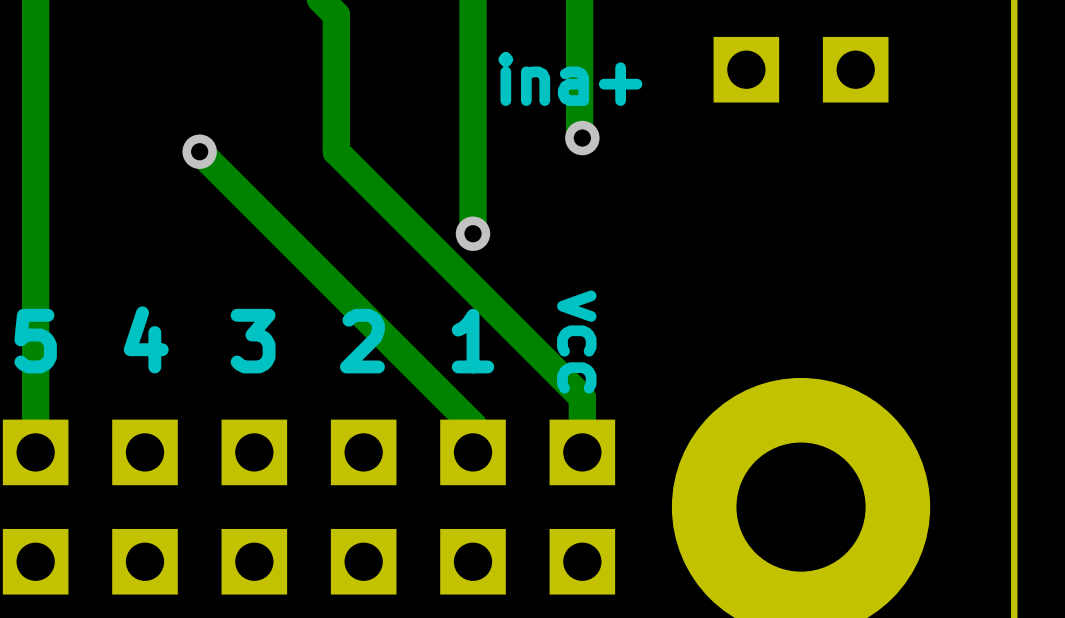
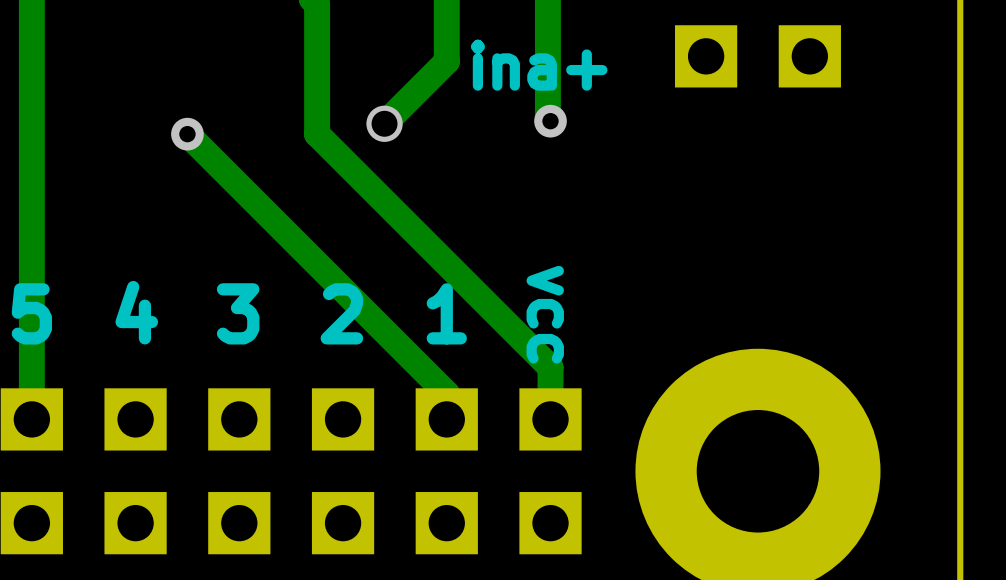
track: (473, 75) (473, 233) -> (446, 61) (384, 123)
via: none -> (384, 123)
via: (473, 233) -> none

